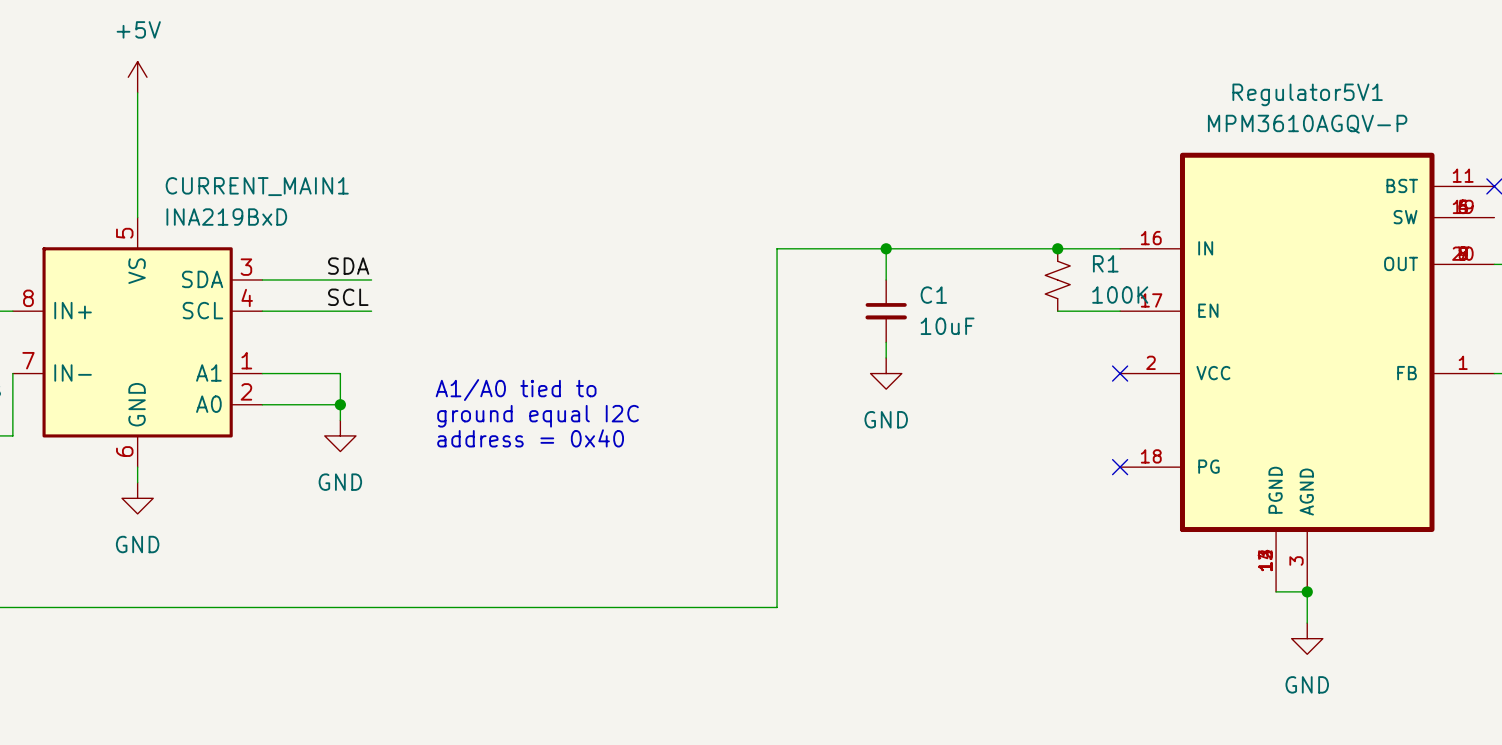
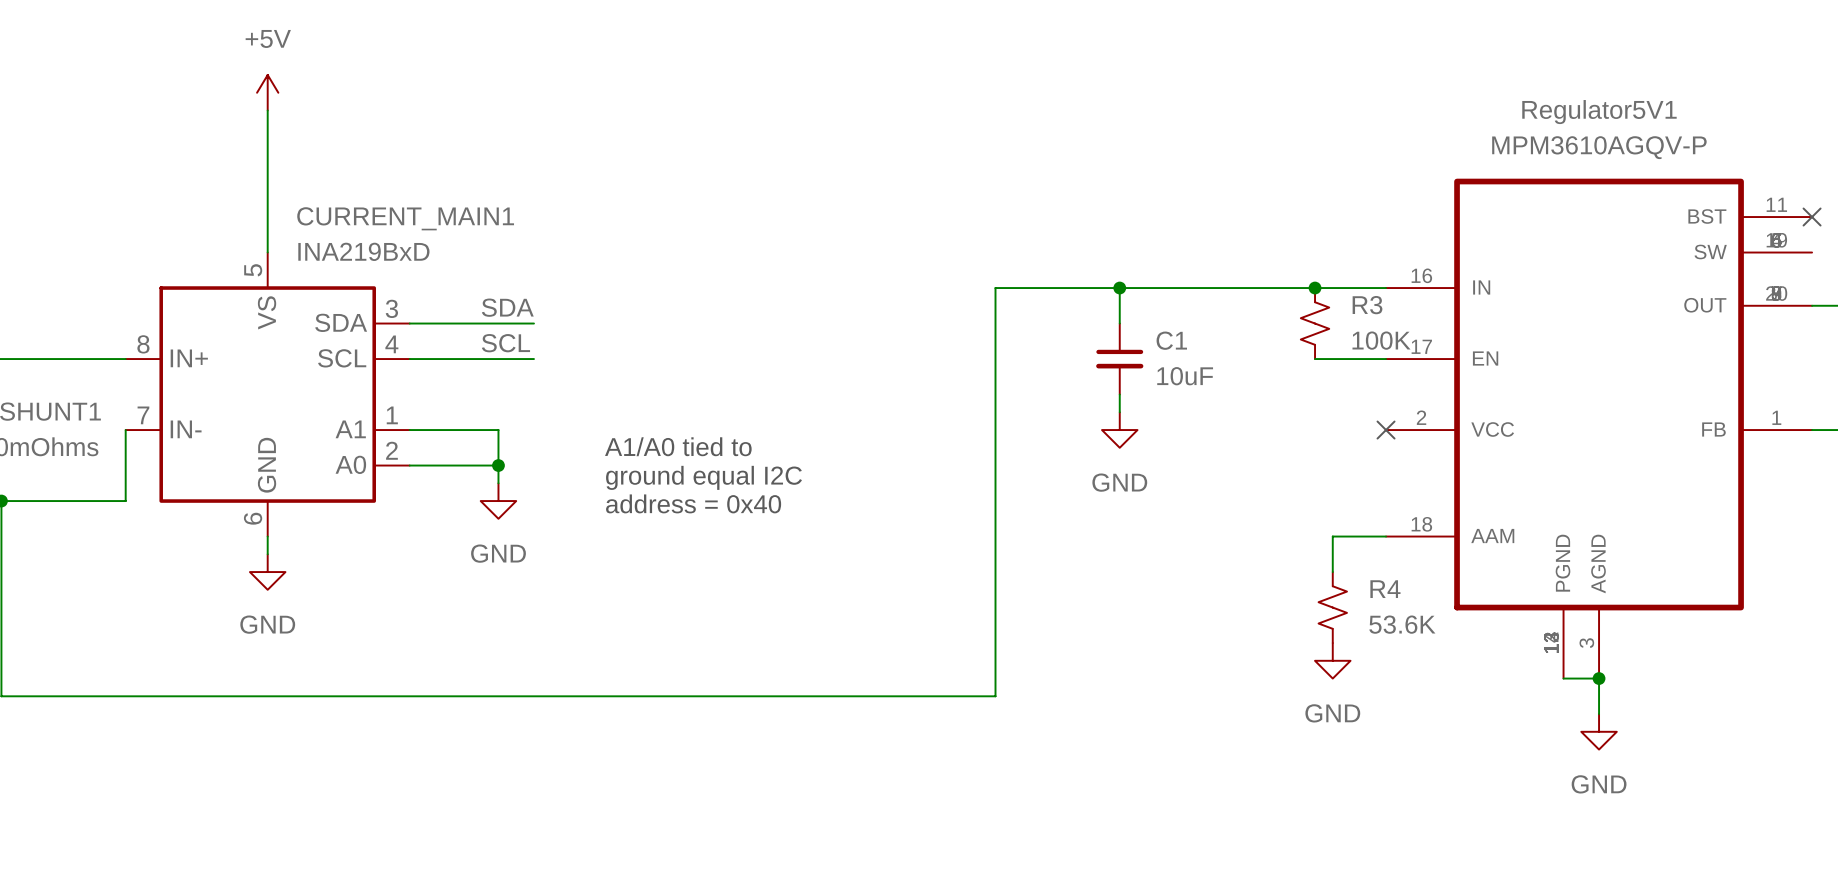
R1 name: R1 (1105, 263) -> R3 (1367, 305)
Regulator5V1 pin name: PG (1208, 466) -> AAM (1492, 536)
wire: none -> (1386, 536) (1332, 536) (1332, 572)
no-connect mark: (1120, 467) -> none
R4: none -> 53.6K (1332, 607)
power symbol: none -> GND (1332, 660)

